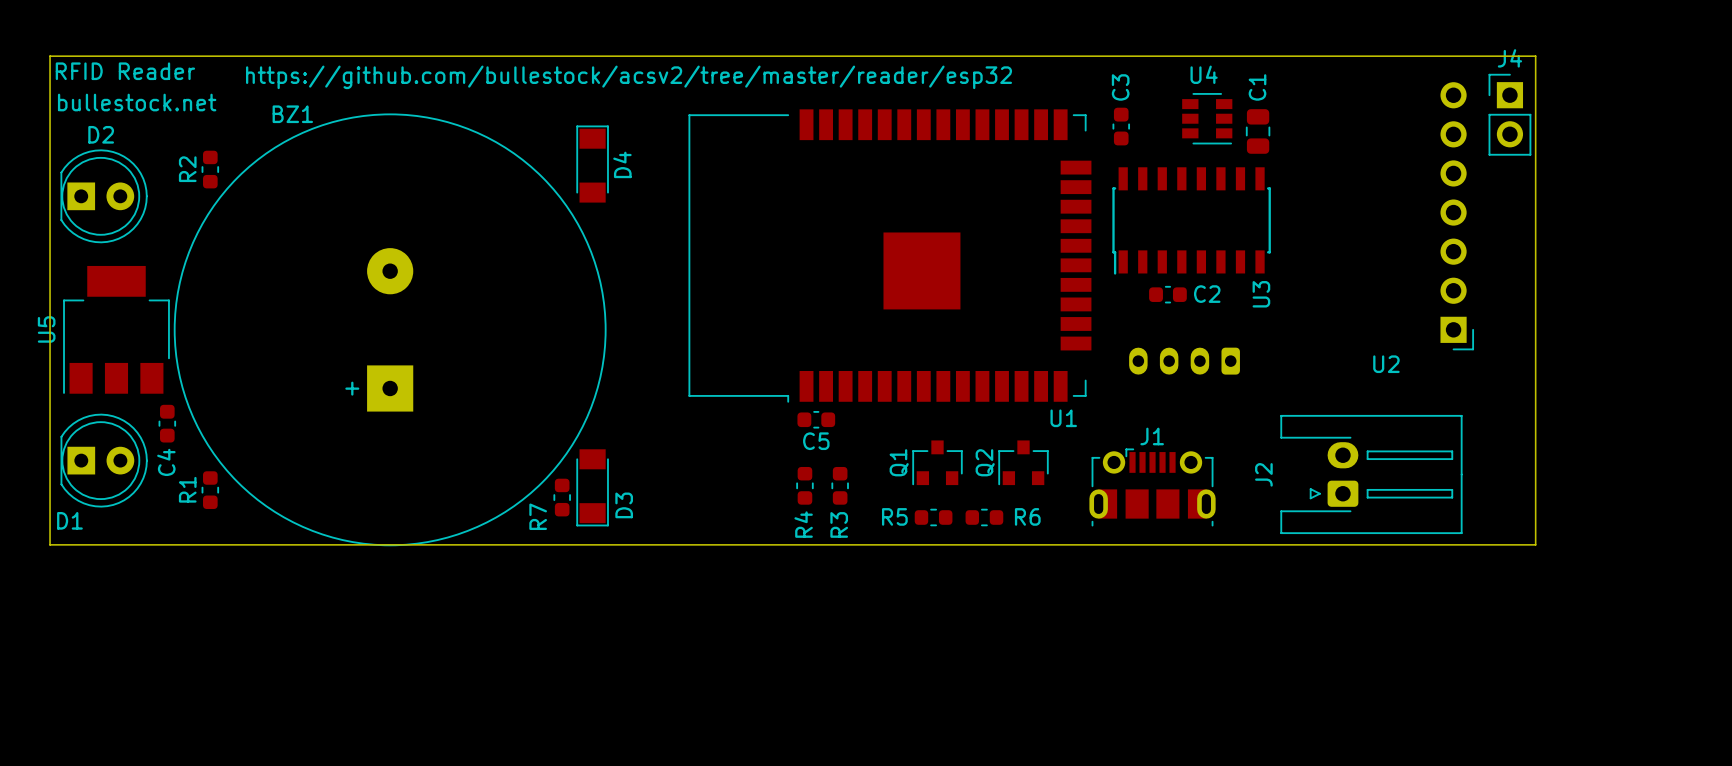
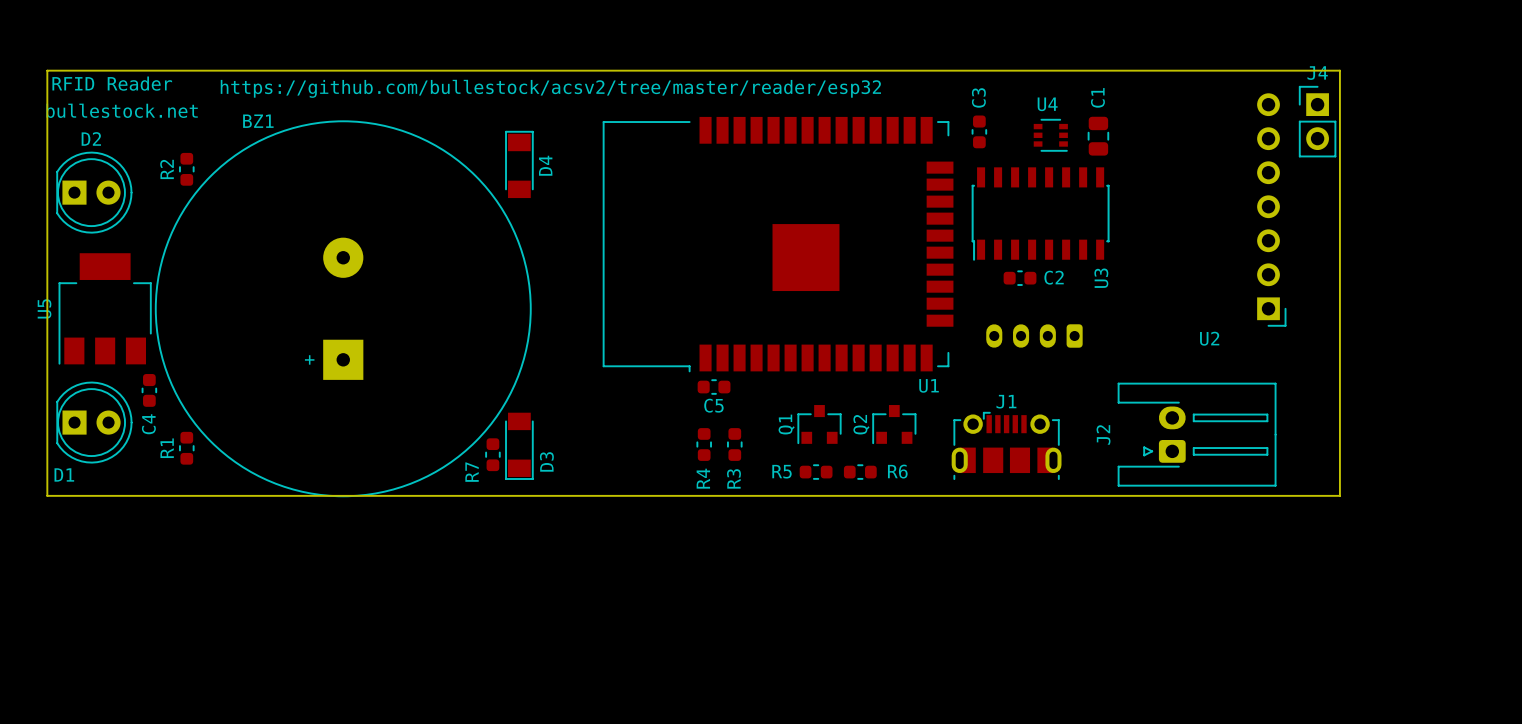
U4 footprint: [1182, 93, 1233, 145] -> [1033, 118, 1068, 152]

